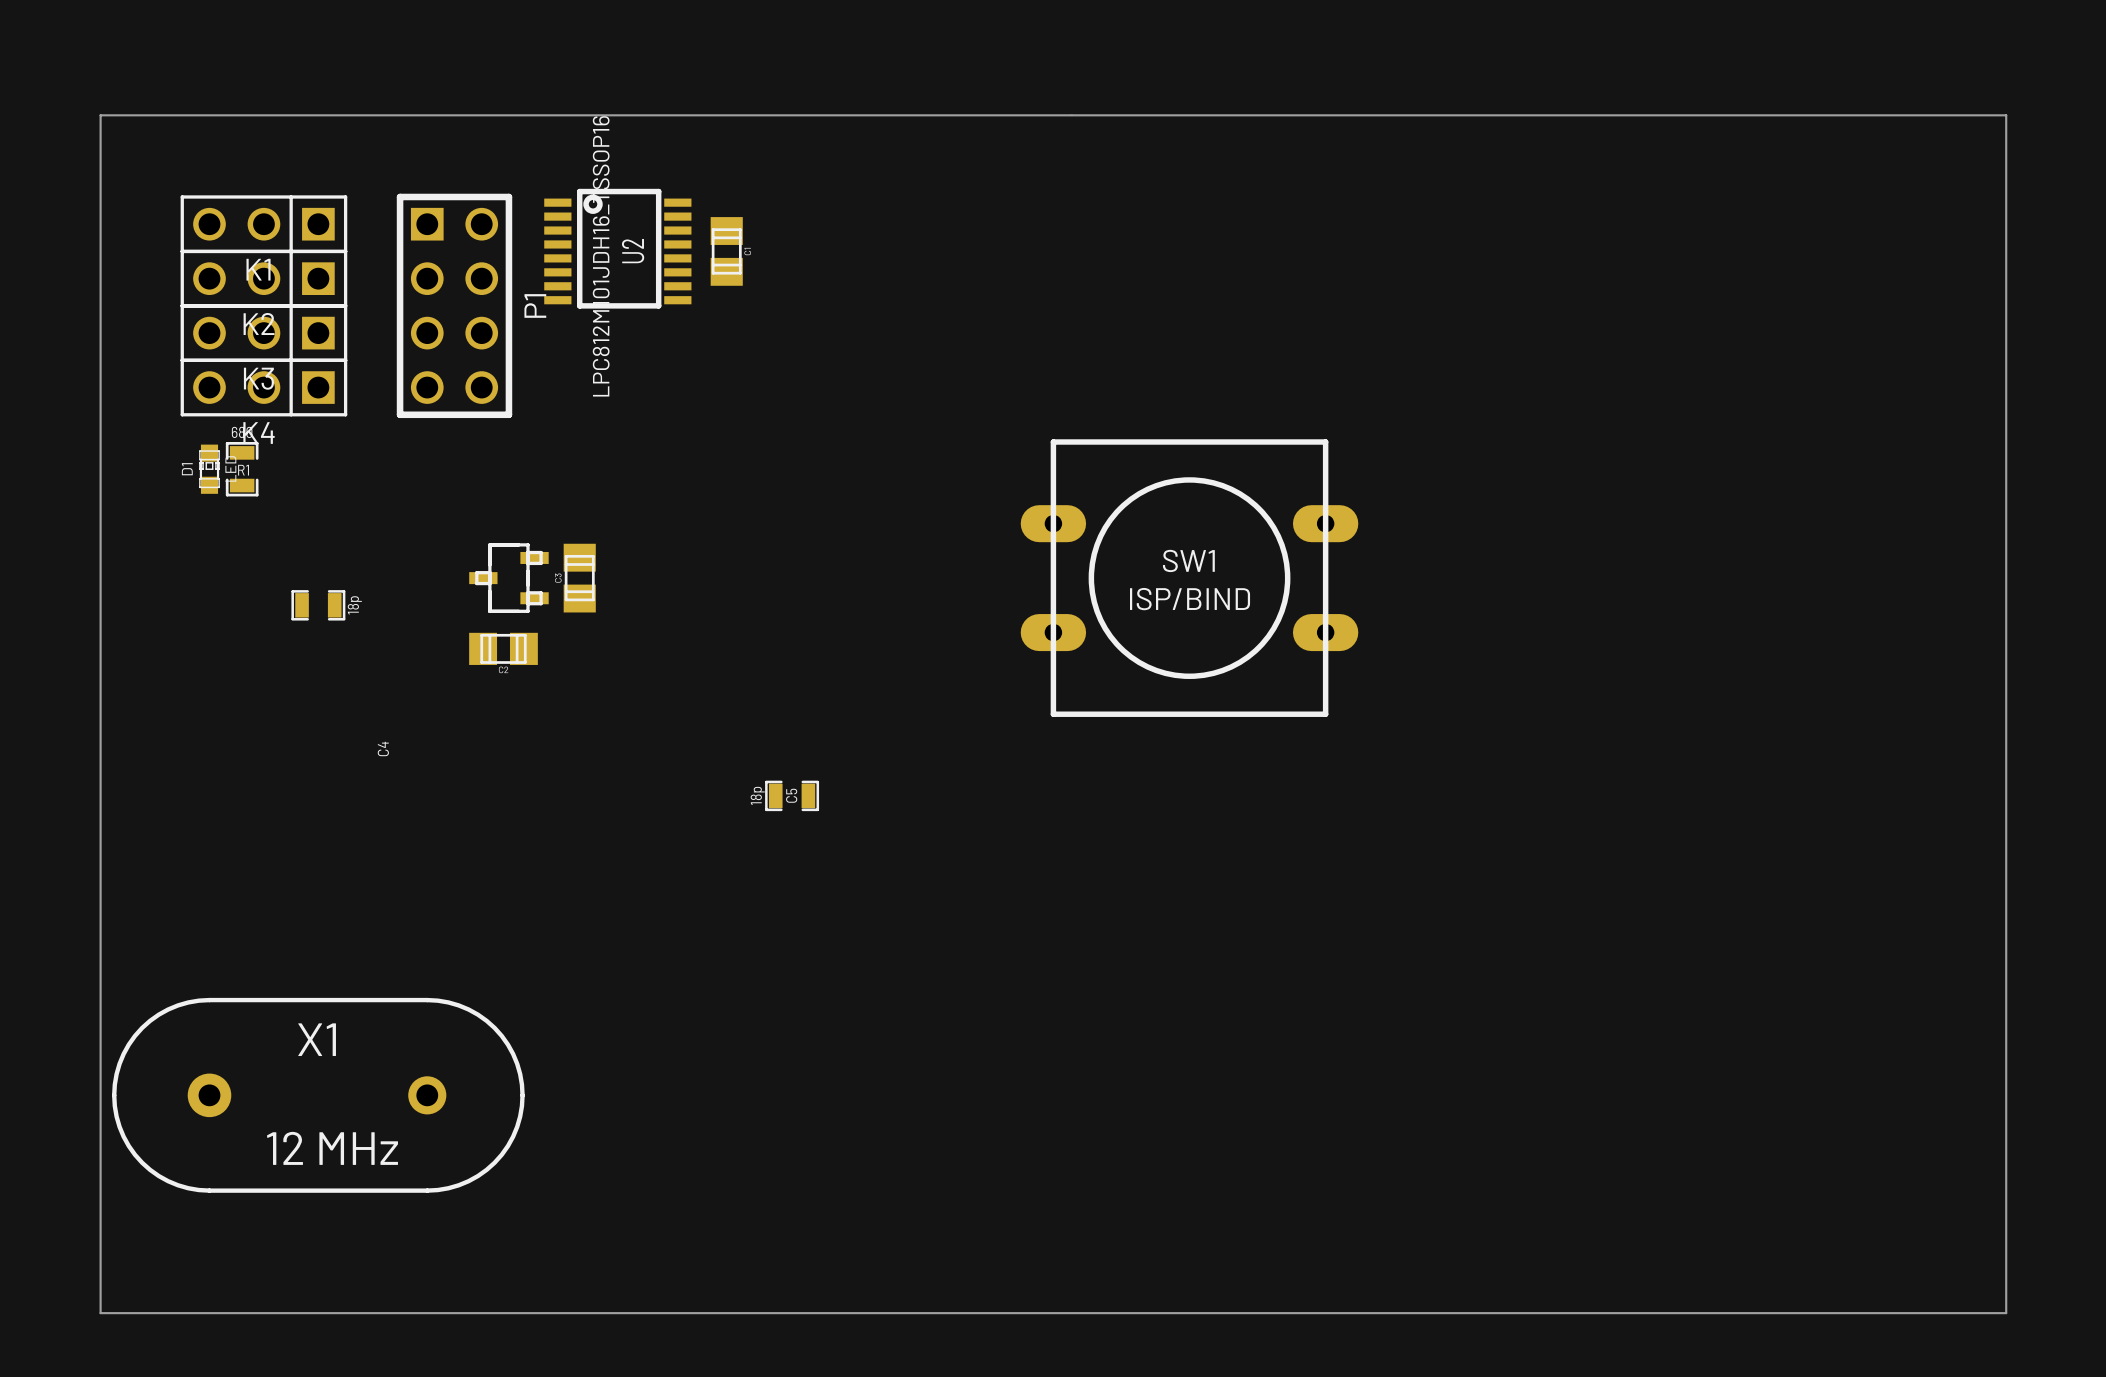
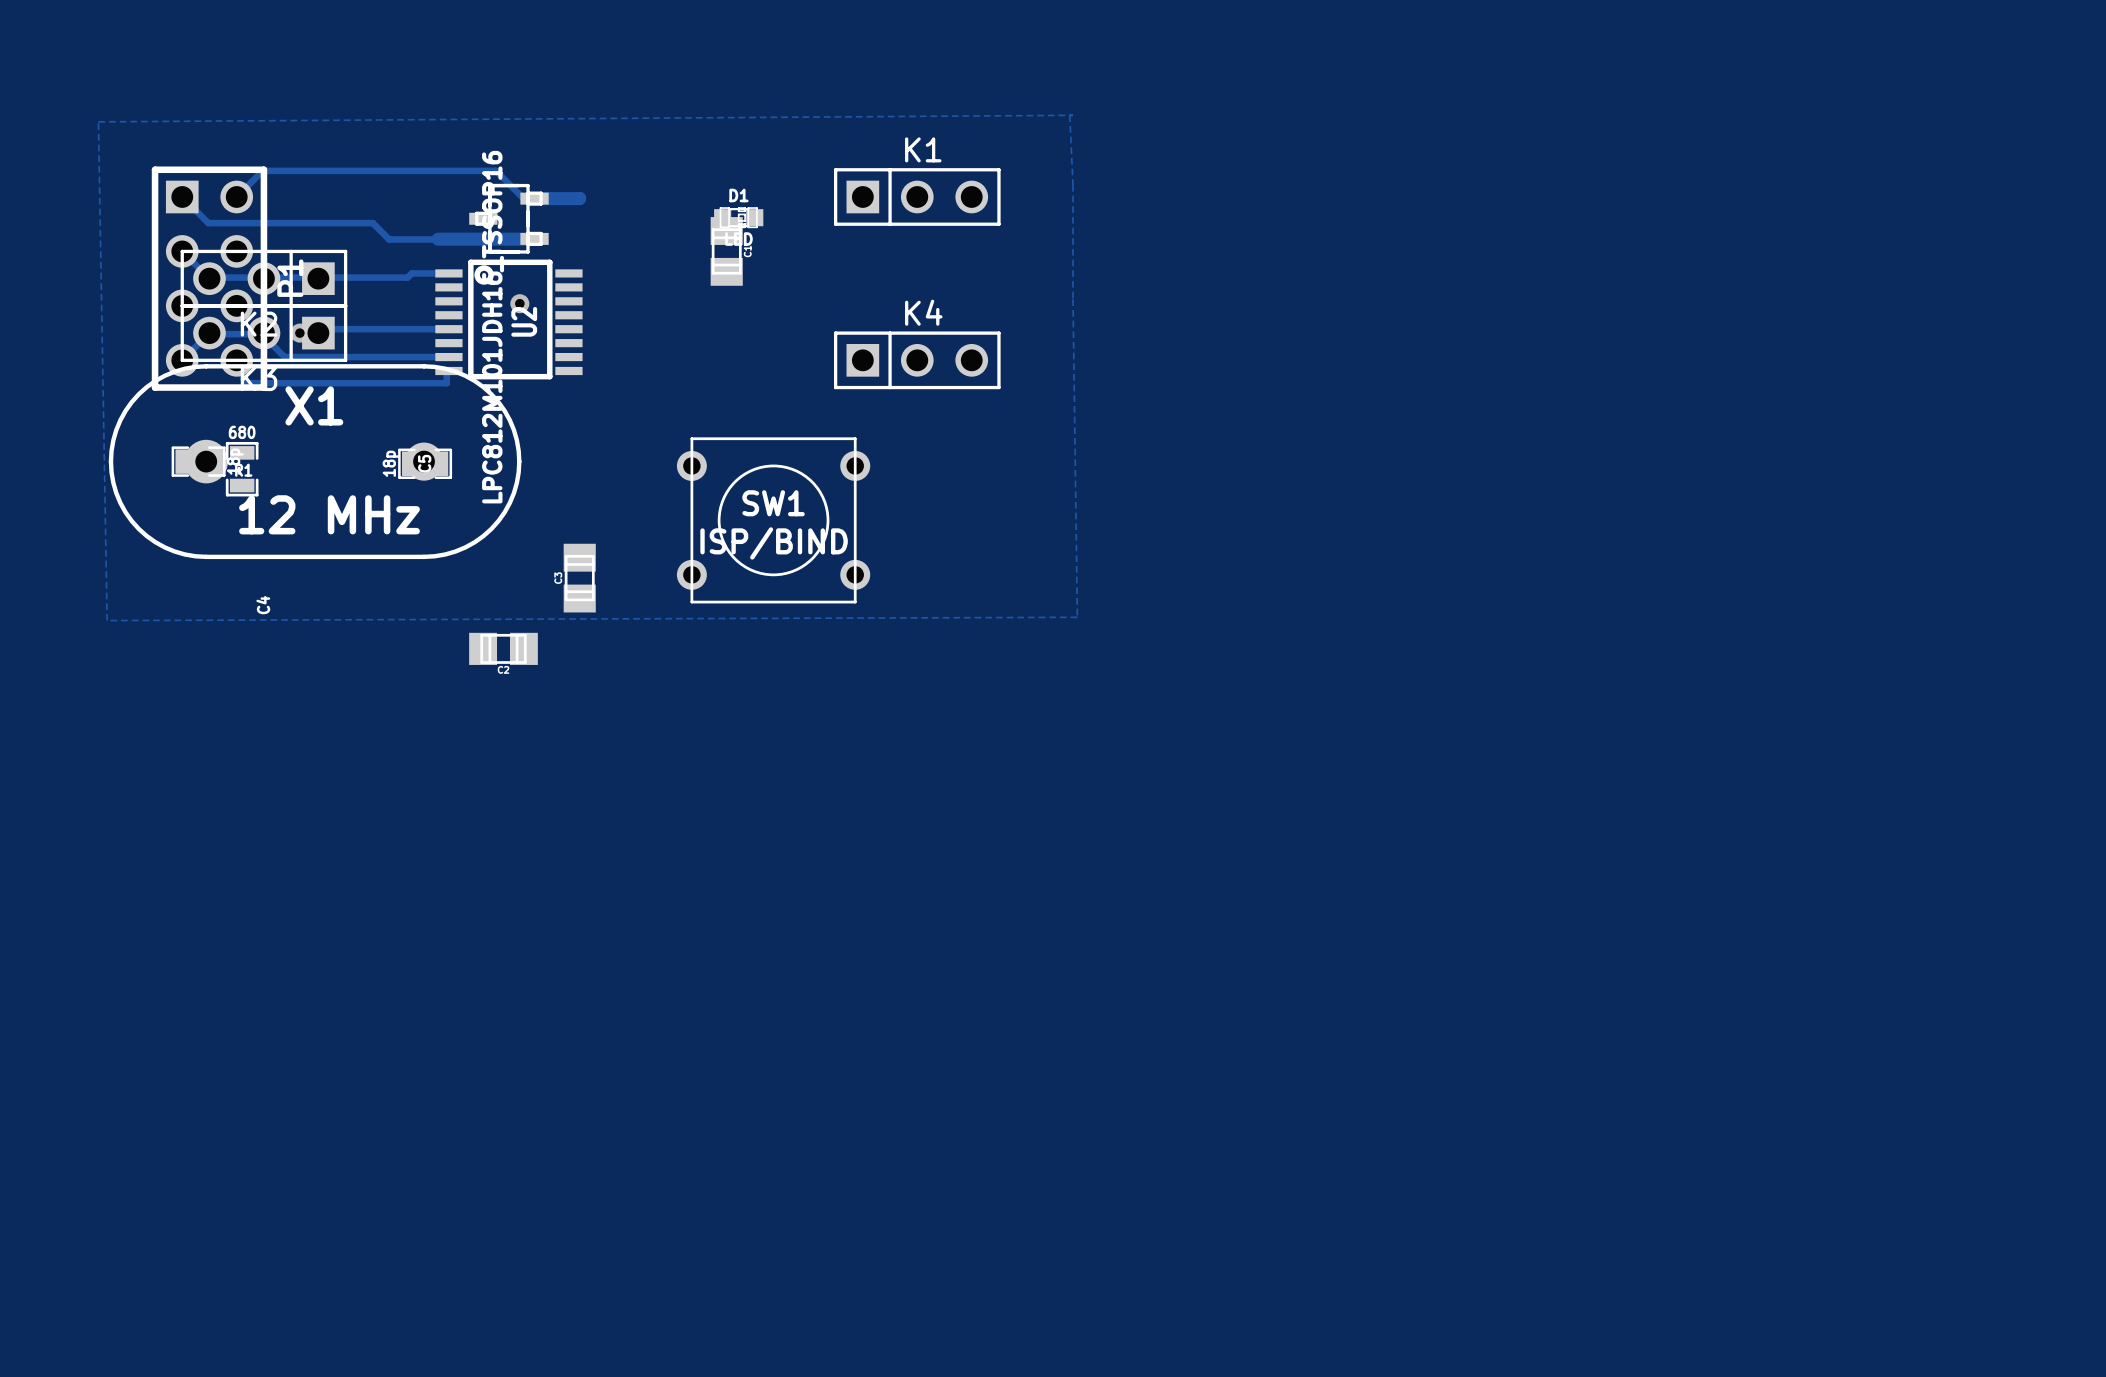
board edge: (100, 115) (100, 1313) (2006, 1313) (2006, 115) (100, 115) -> none
zone outline: none -> (1069, 115) (98, 121) (107, 620) (1077, 617) (1073, 185) (1069, 115)
track: none -> (182, 196) (208, 223) (372, 223) (389, 239) (437, 239)
track: none -> (236, 196) (262, 170) (495, 170) (523, 198) (579, 198)
K1 rotation: 0° (263, 224) -> 180° (917, 196)
K1 position: (263, 224) -> (917, 196)
track: none -> (438, 239) (534, 239)
U2 position: (617, 248) -> (508, 319)
track: none -> (182, 251) (208, 277) (407, 277) (411, 273) (448, 273)
via: none -> (519, 303)
P1 position: (454, 305) -> (209, 278)
track: none -> (448, 329) (303, 329) (299, 333)
via: none -> (299, 333)
track: none -> (448, 357) (284, 357) (261, 334) (208, 334) (182, 360)
track: none -> (236, 360) (245, 383) (446, 383) (446, 373) (448, 371)
K4 rotation: 0° (263, 387) -> 180° (917, 360)
K4 position: (263, 387) -> (917, 360)
SW1 footprint: [1020, 439, 1359, 717] -> [676, 437, 871, 604]
D1 rotation: 0° (209, 469) -> 90° clockwise (738, 217)
D1 position: (209, 469) -> (738, 217)
part position: (508, 578) -> (508, 218)
C4 position: (318, 605) -> (198, 461)
C5 position: (792, 795) -> (425, 463)
X1 position: (318, 1095) -> (315, 461)

